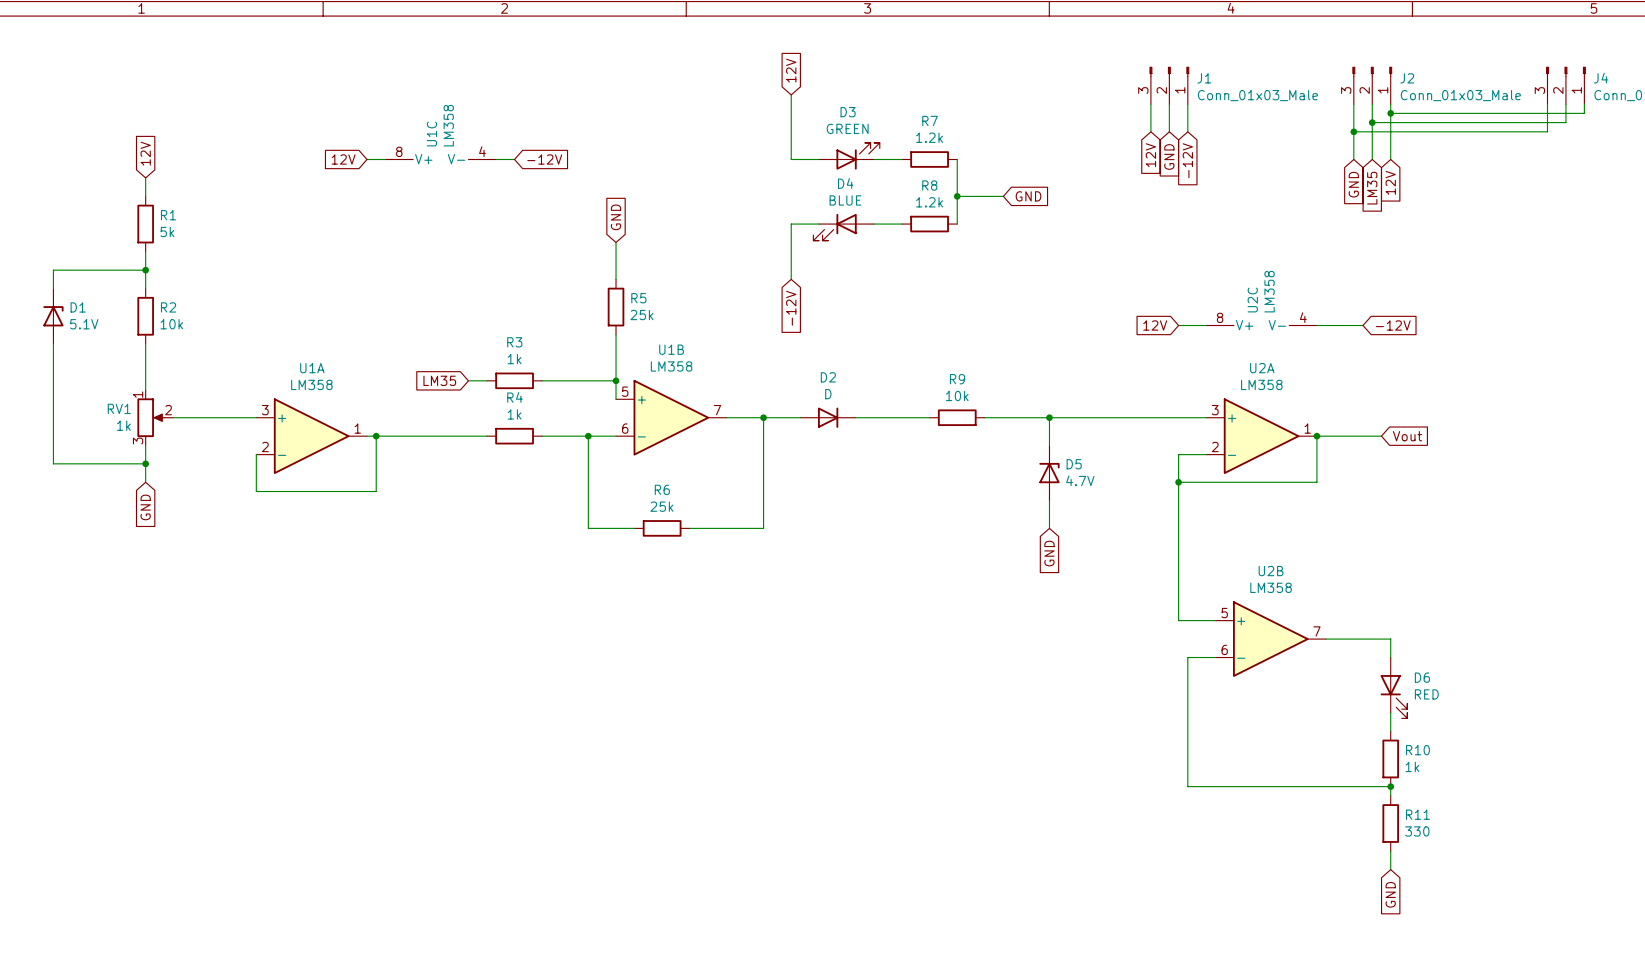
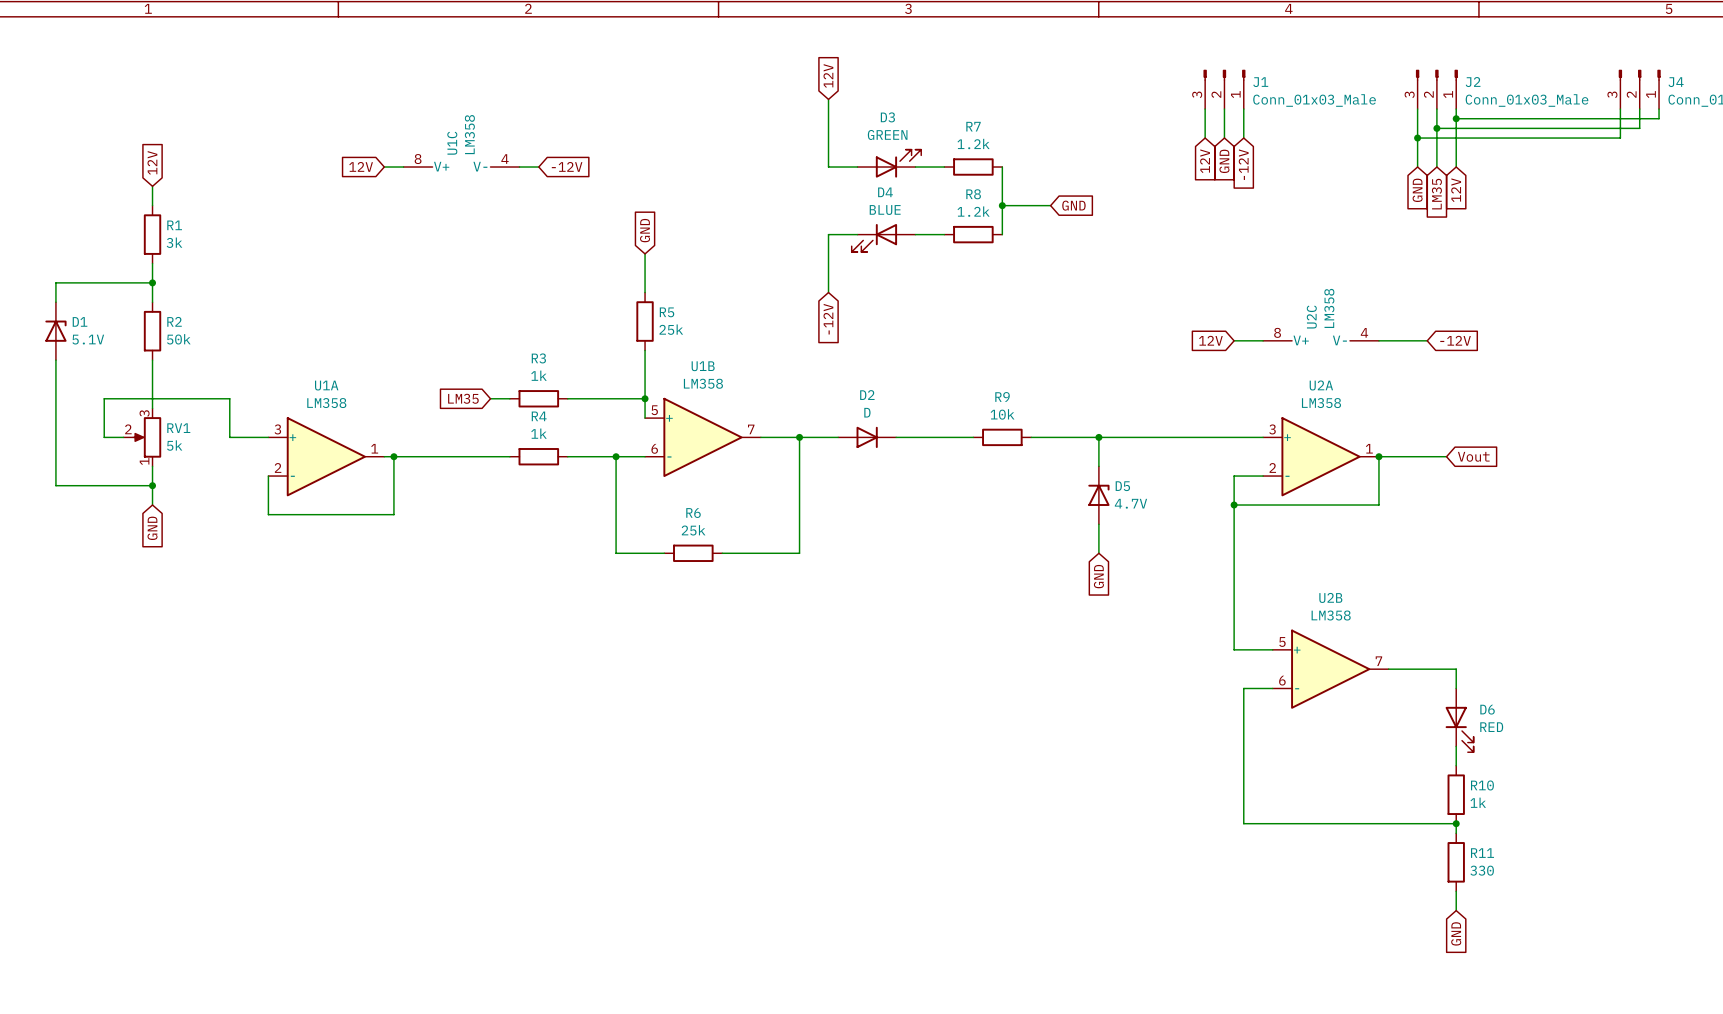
R1 value: 5k (167, 232) -> 3k (174, 242)
R2 value: 10k (171, 324) -> 50k (178, 339)
RV1 name position: RV1 (119, 408) -> RV1 (178, 428)
RV1 rotation: 0° (150, 417) -> 180° (147, 437)
wire: (173, 417) (219, 417) -> (123, 437) (104, 437) (104, 398) (229, 398) (229, 437)
RV1 value: 1k (123, 425) -> 5k (174, 445)

